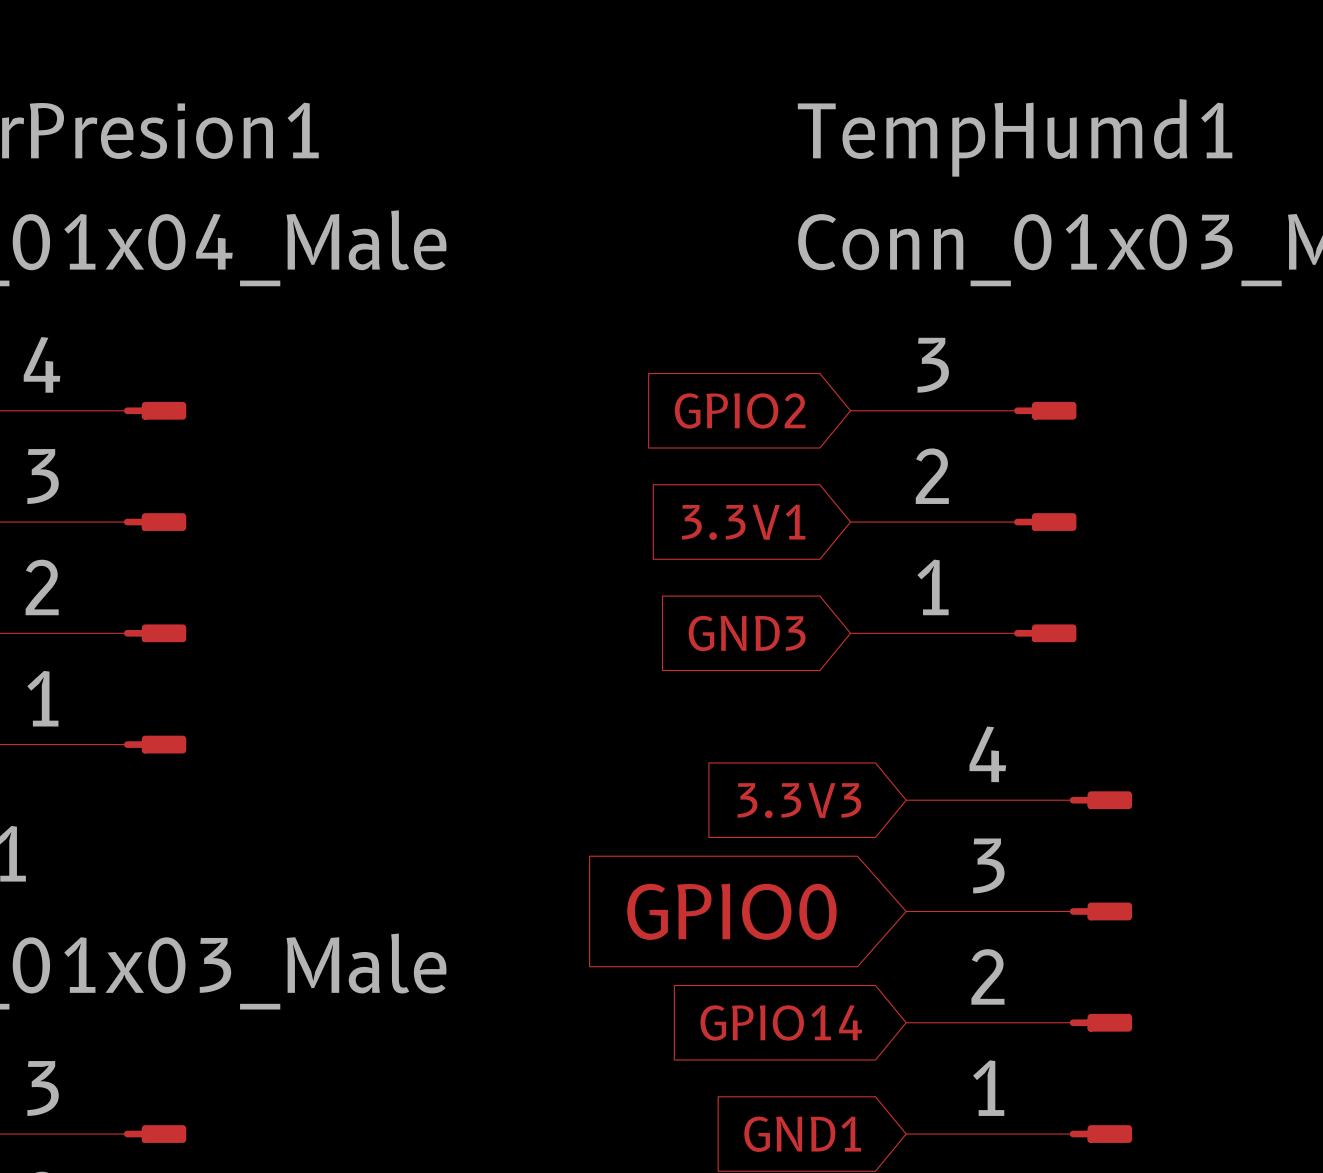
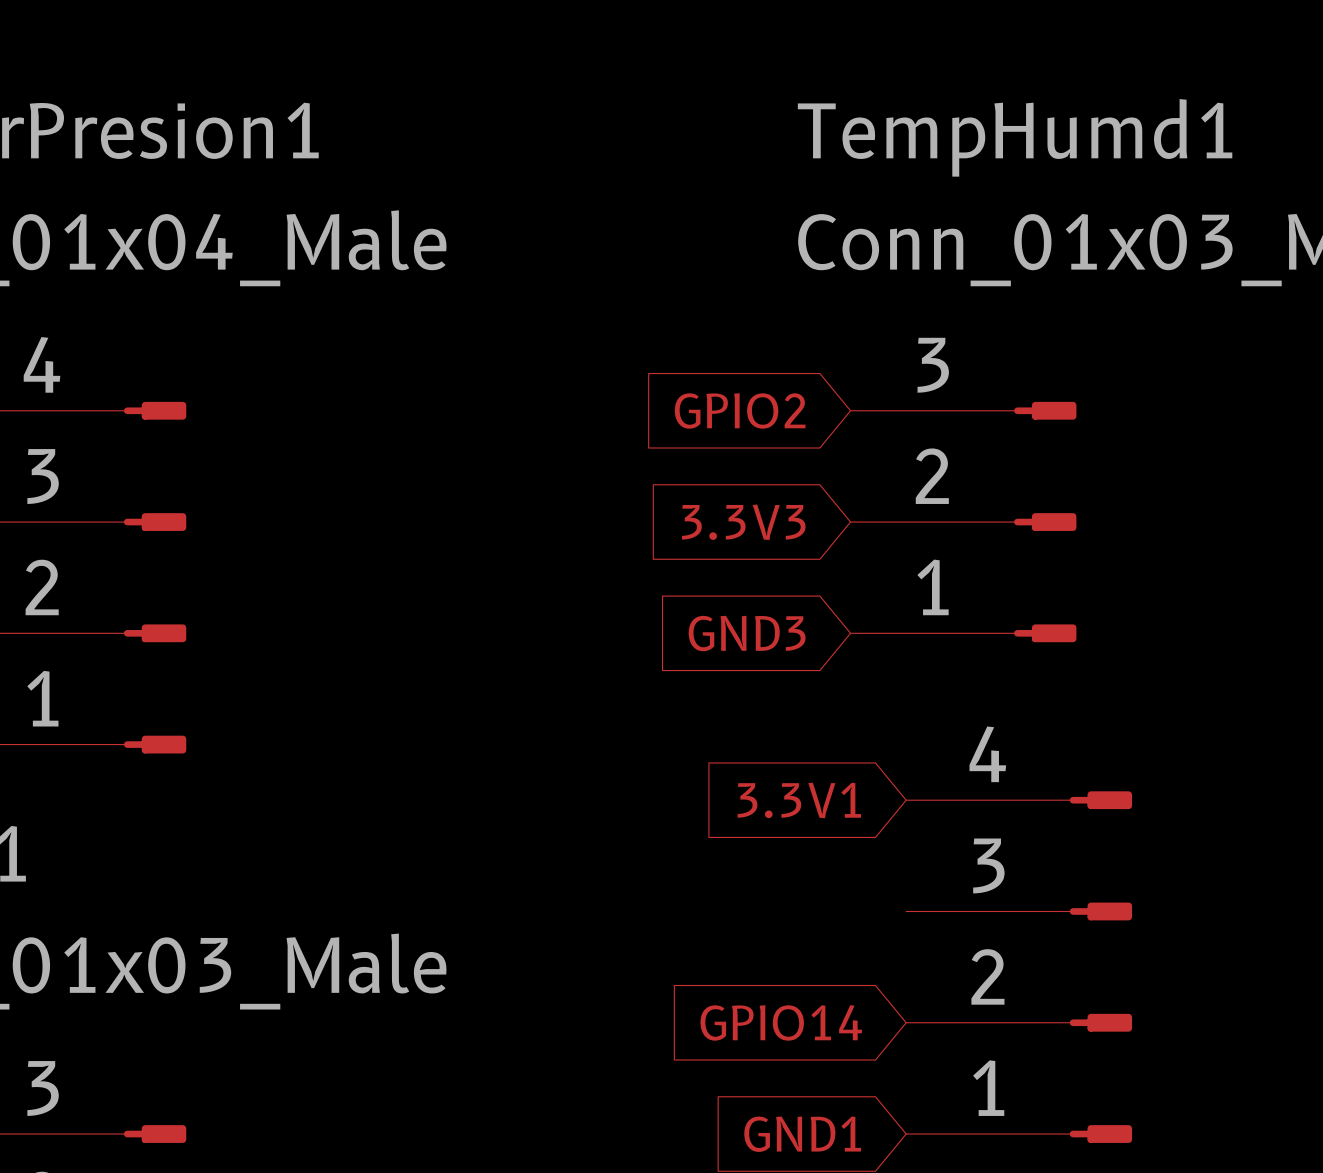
global label: 3.3V1 (743, 522) -> 3.3V3 (743, 522)
global label: 3.3V3 (799, 800) -> 3.3V1 (799, 800)
global label: GPIO0 (731, 911) -> none

